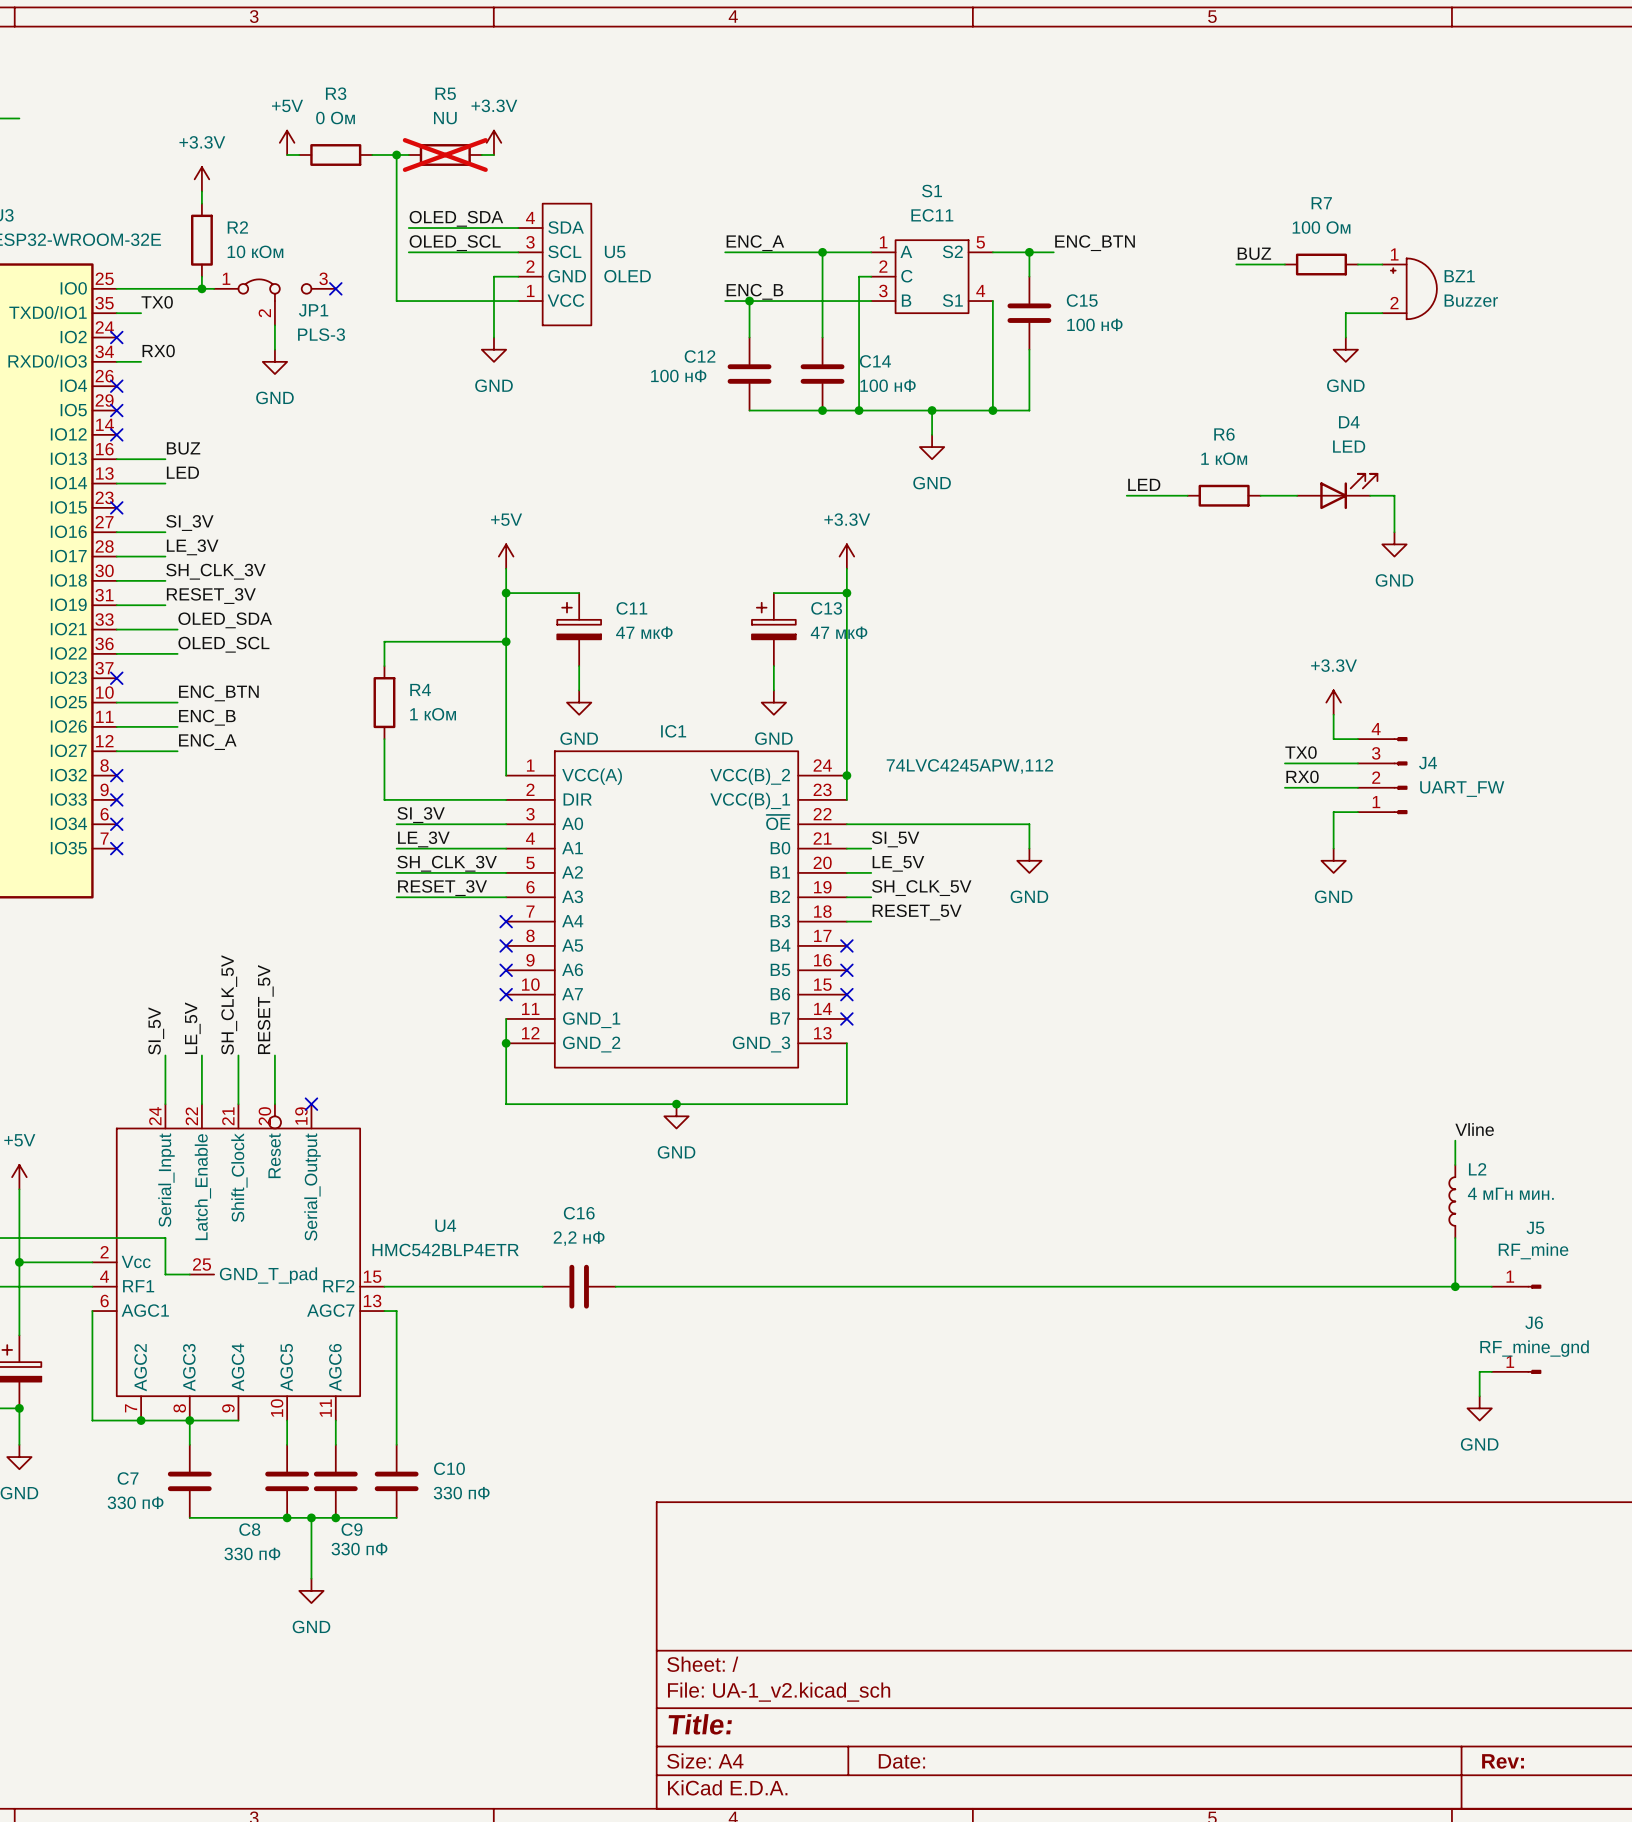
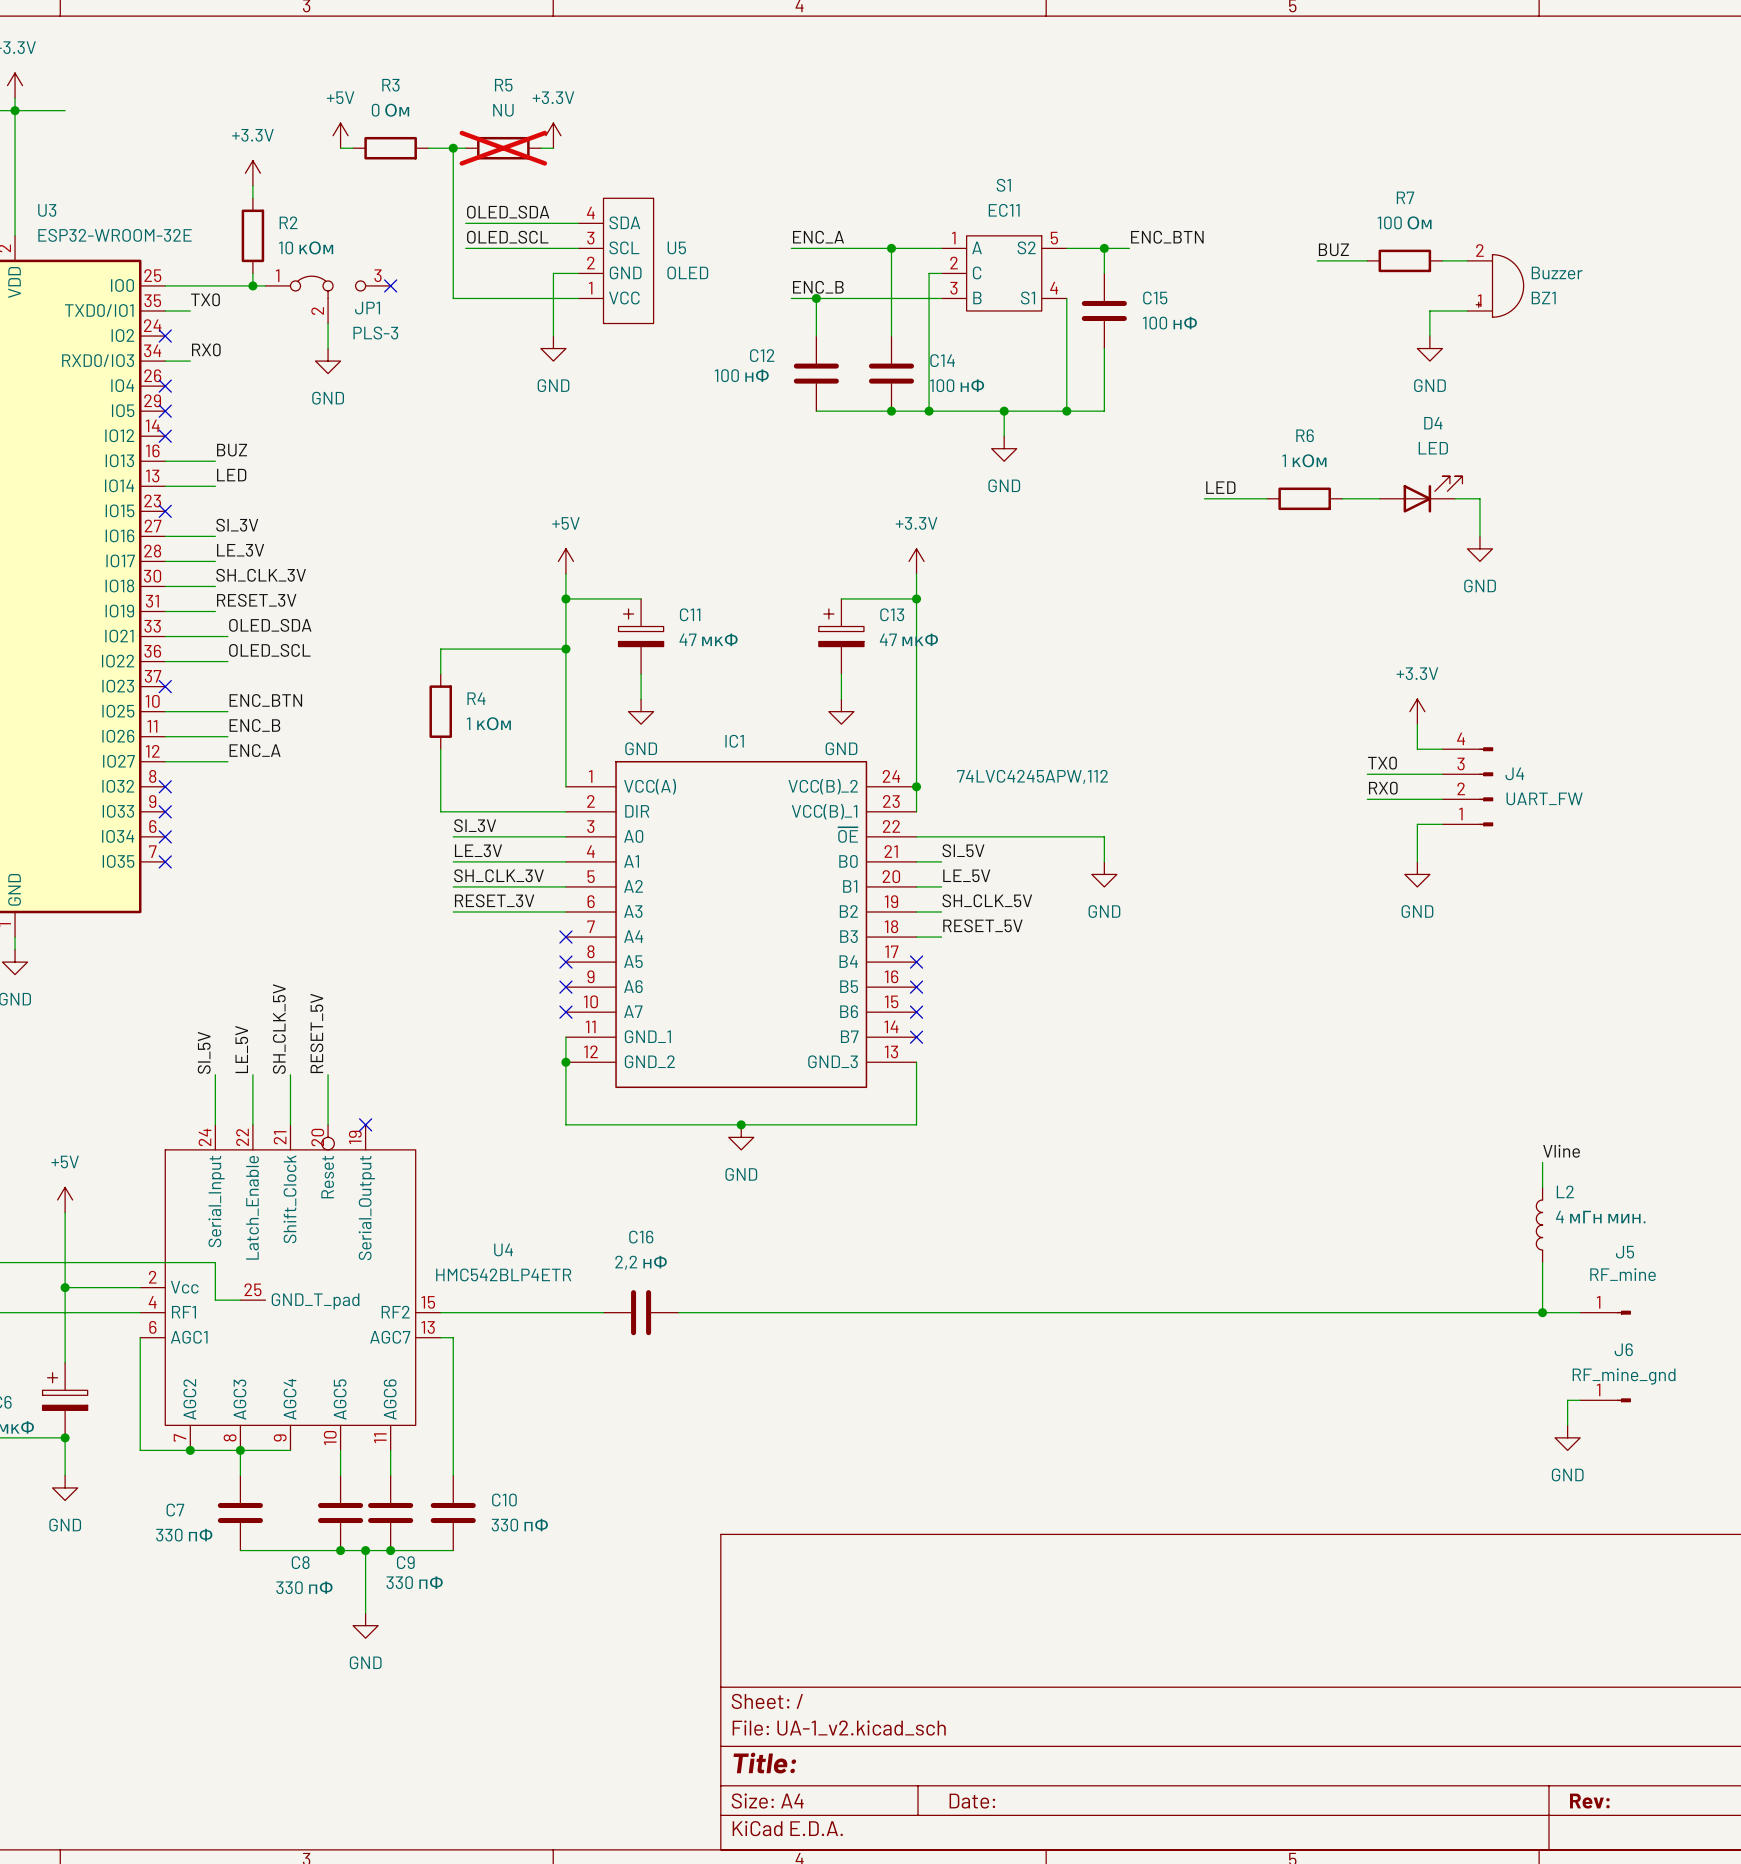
BZ1 flip: as is (1413, 288) -> up-down (1499, 285)

